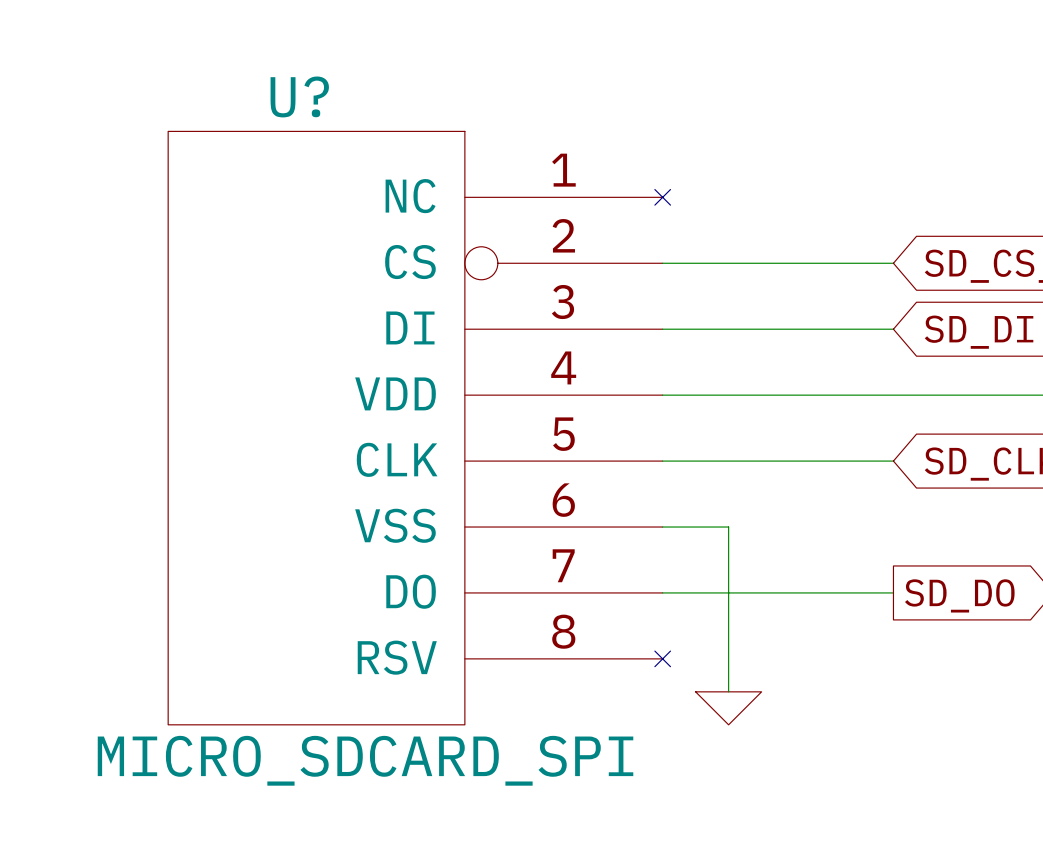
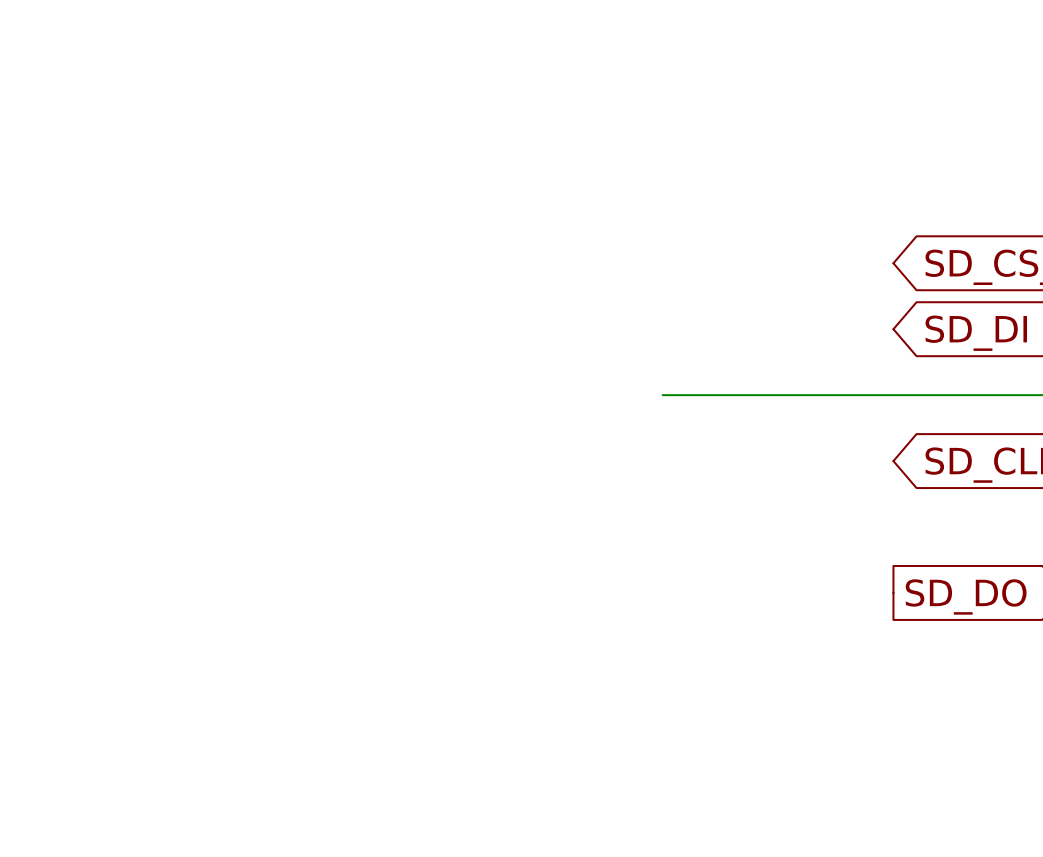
wire: (662, 263) (893, 263) -> none
wire: (662, 329) (893, 329) -> none
U?: MICRO_SDCARD_SPI (419, 428) -> none
wire: (662, 461) (893, 461) -> none
wire: (662, 527) (728, 527) (728, 691) -> none
wire: (662, 592) (893, 592) -> none
power symbol: (728, 708) -> none

